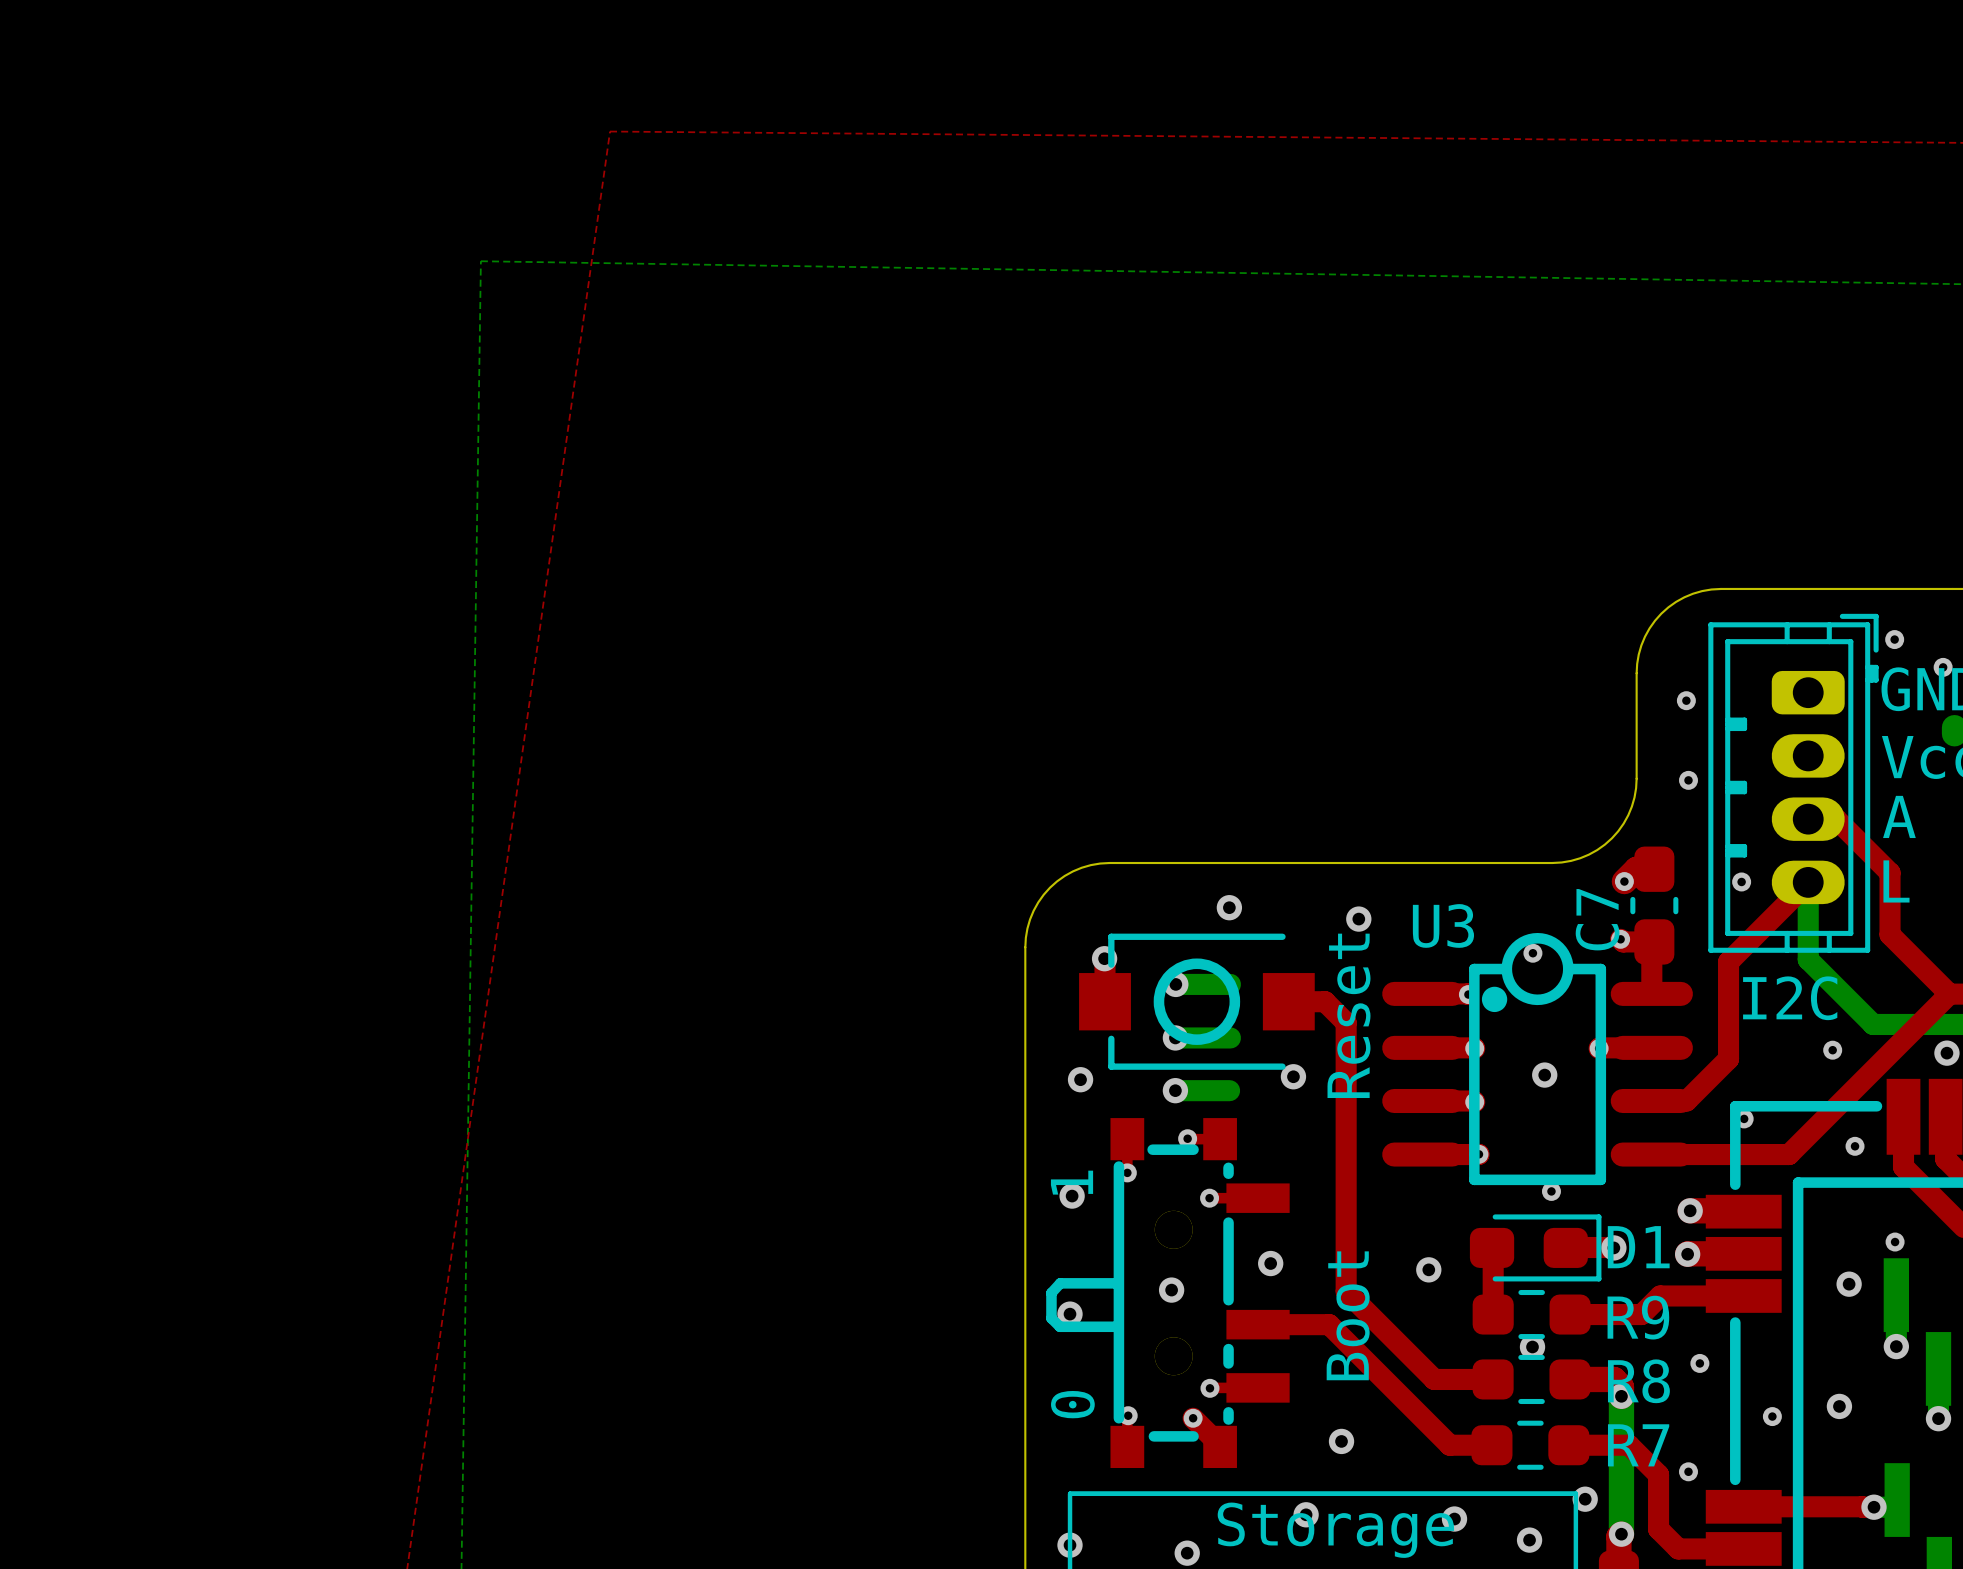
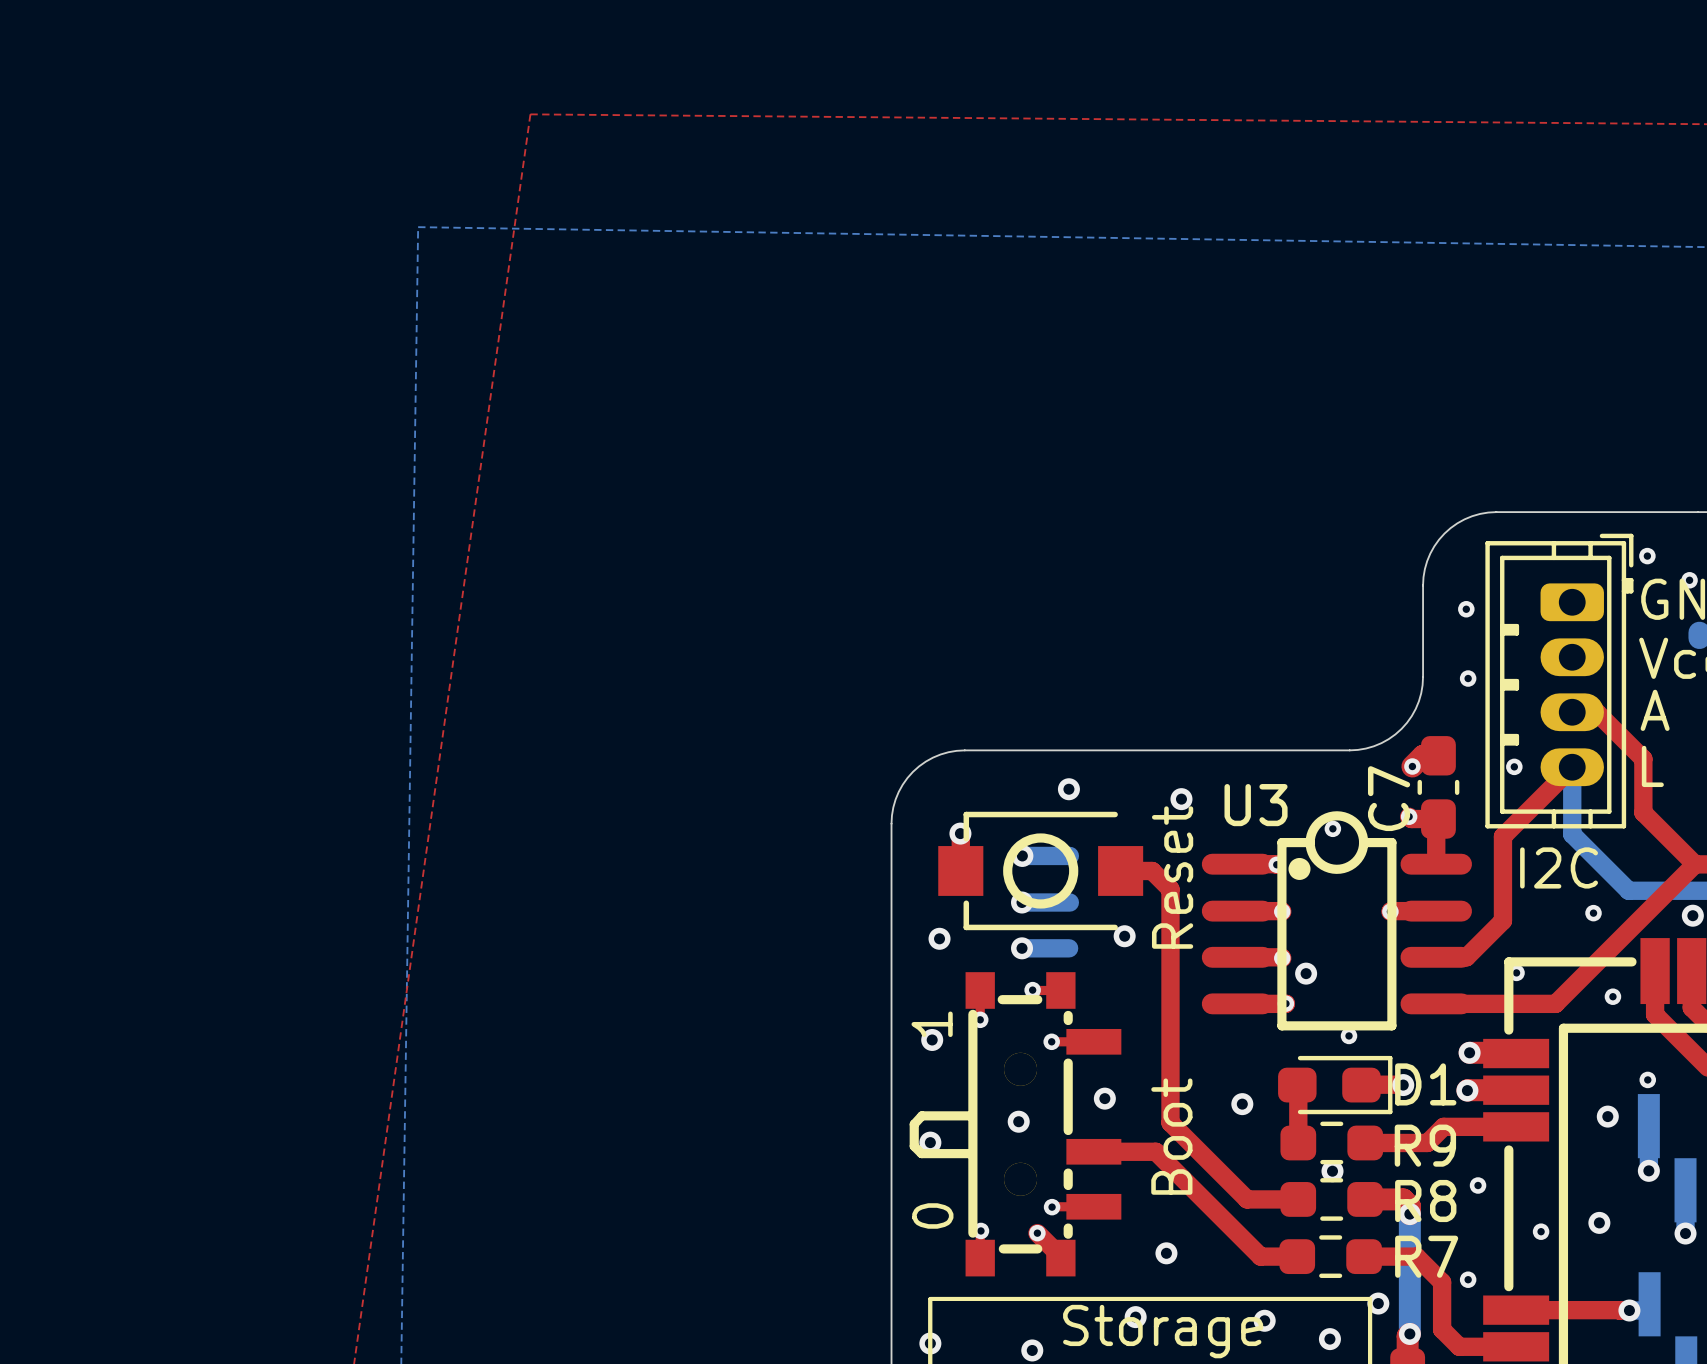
via position: (1544, 1075) -> (1306, 973)

